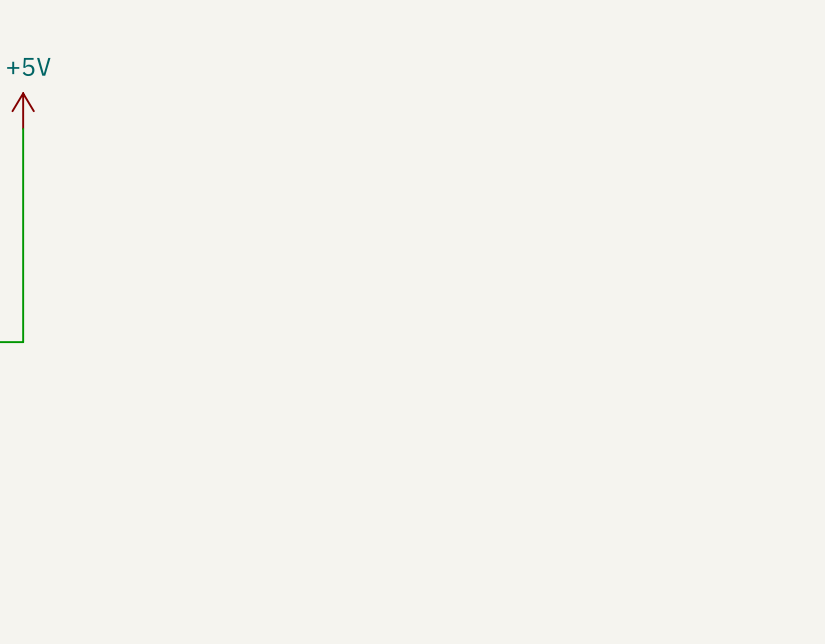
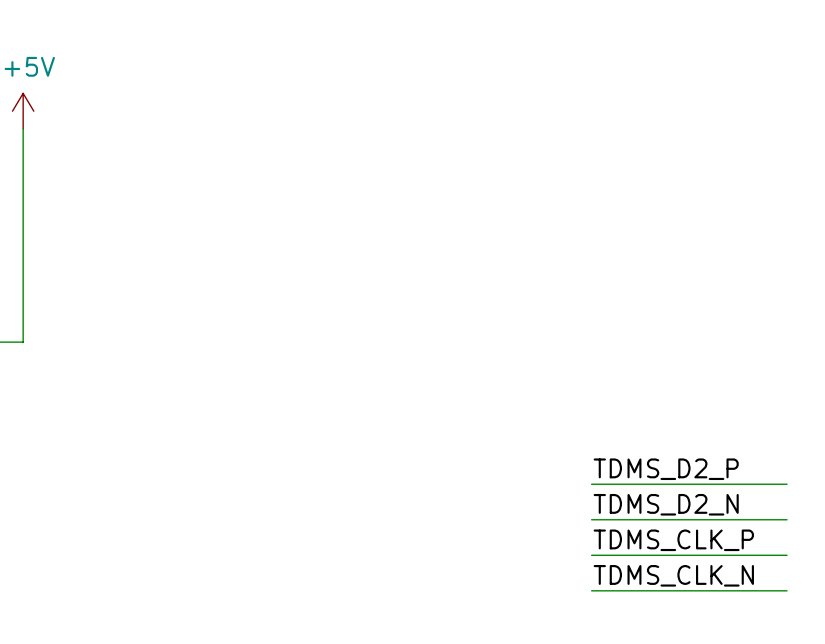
label: none -> TDMS_D2_P (666, 469)
wire: none -> (591, 484) (787, 484)
label: none -> TDMS_D2_N (666, 504)
wire: none -> (591, 519) (787, 519)
label: none -> TDMS_CLK_P (673, 540)
wire: none -> (591, 555) (787, 555)
label: none -> TDMS_CLK_N (673, 575)
wire: none -> (591, 590) (787, 590)

